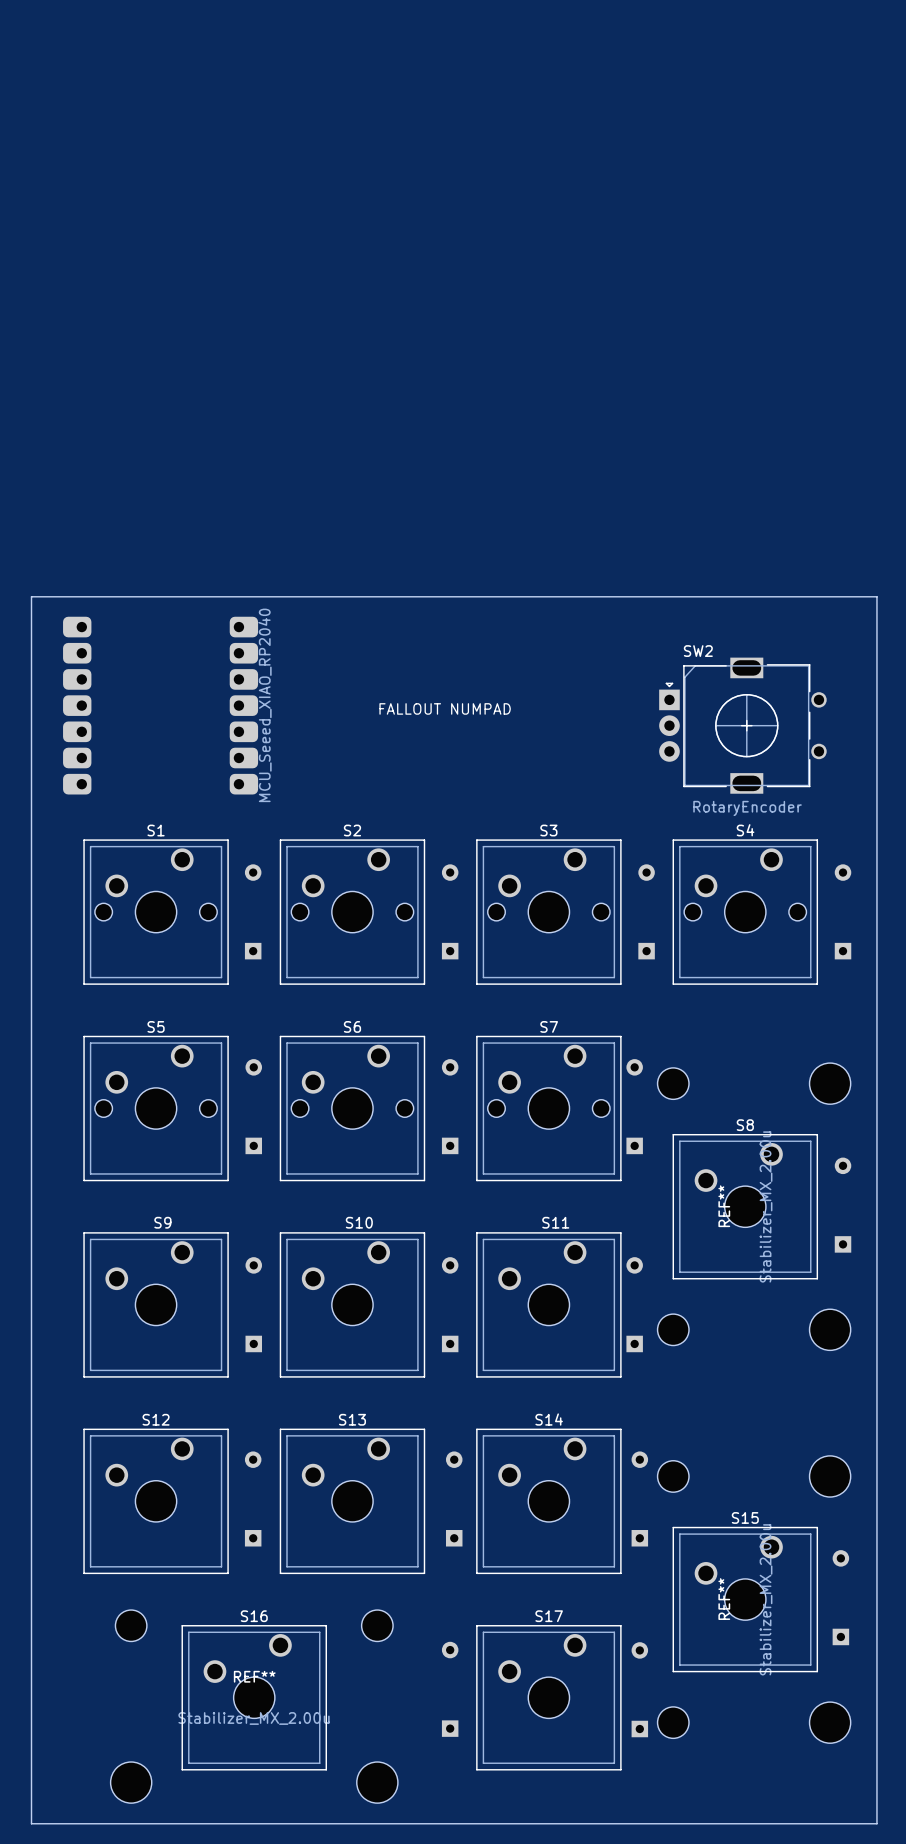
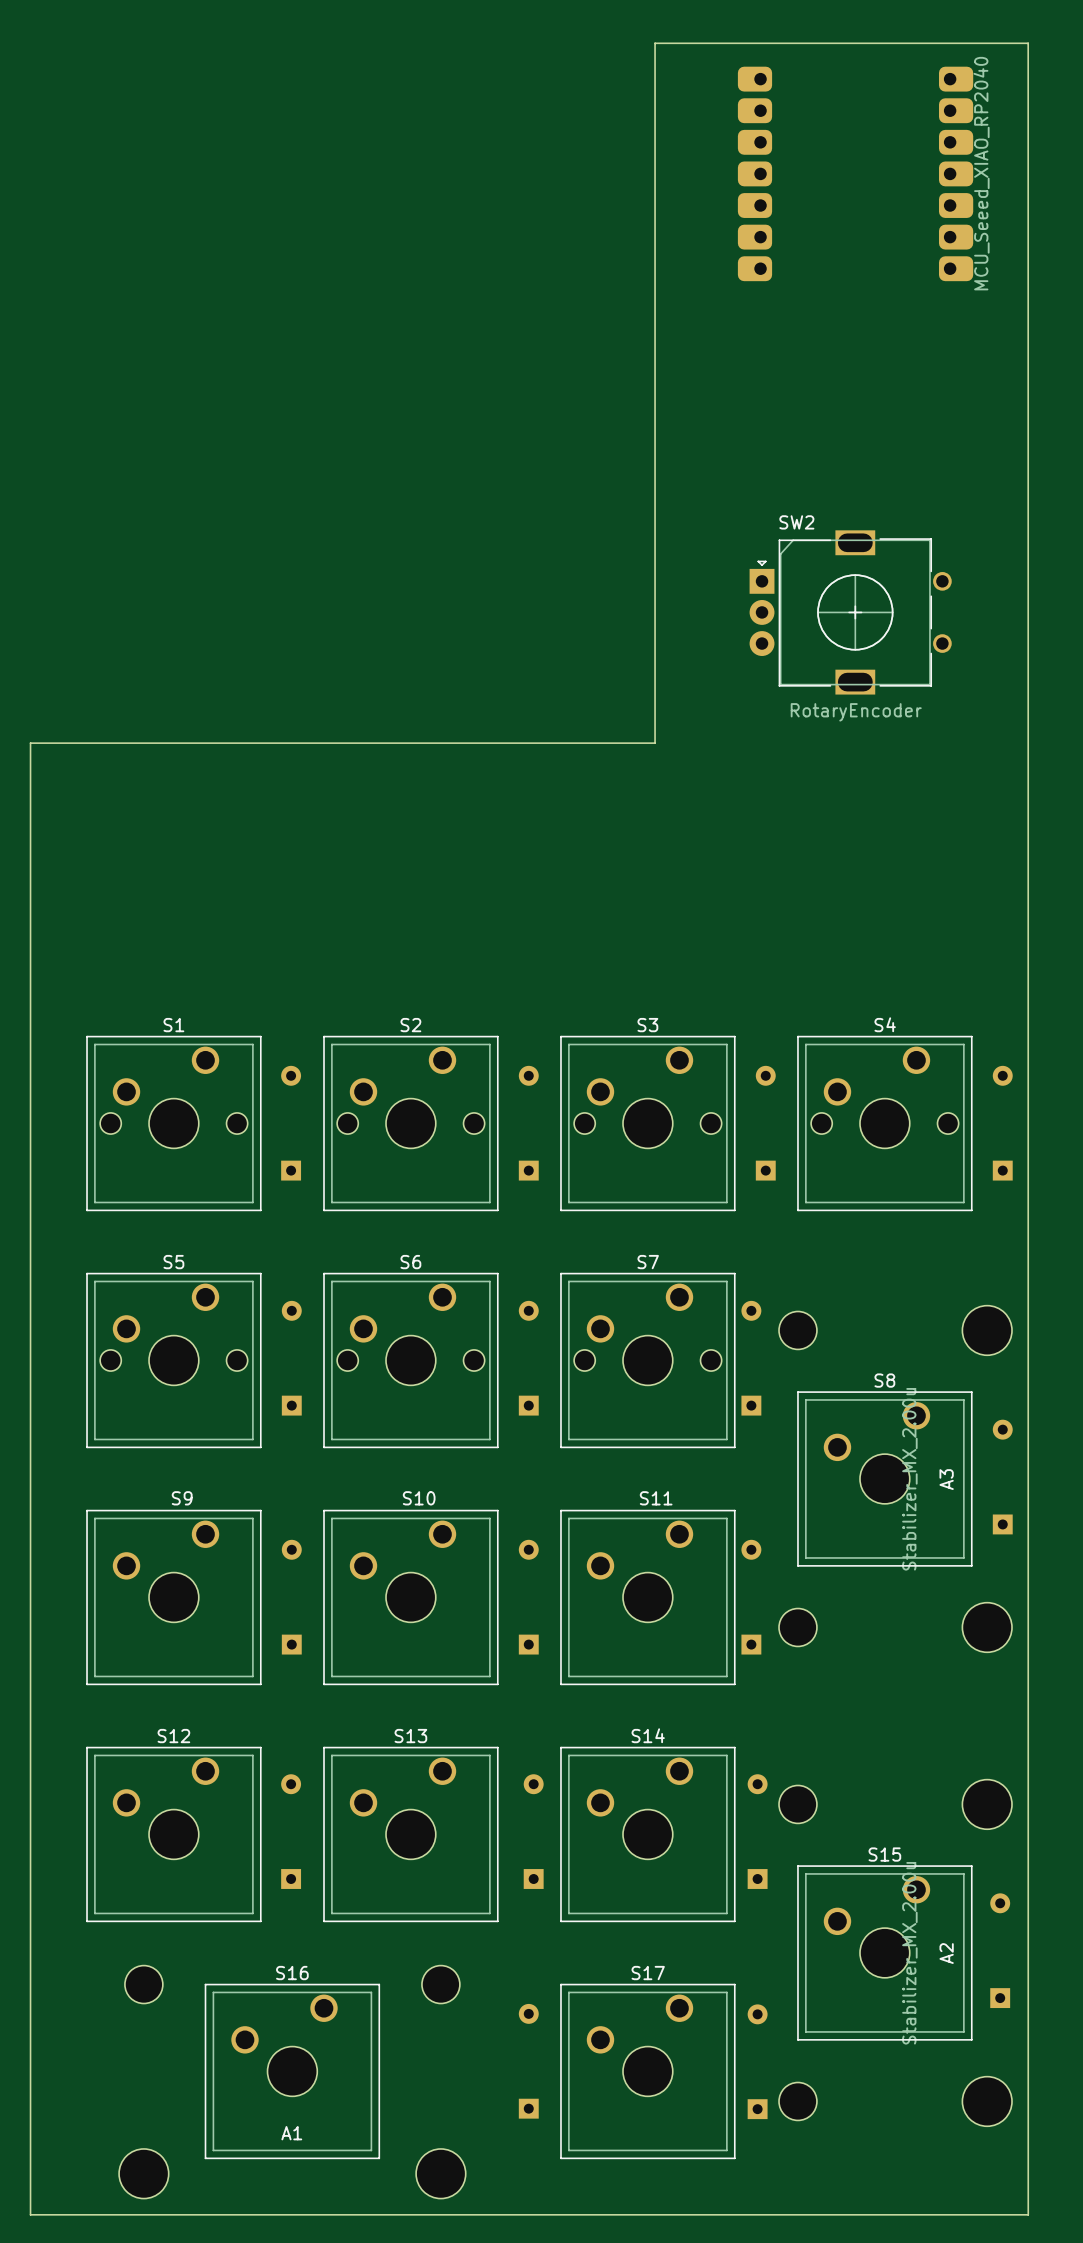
part: none -> MCU_Seeed_XIAO_RP2040 (855, 173)
board edge: (31, 596) (876, 596) (876, 1823) (31, 1823) (31, 596) -> (655, 43) (655, 743) (30, 743) (30, 2214) (1028, 2214) (1028, 43) (655, 43)
part: MCU_Seeed_XIAO_RP2040 (160, 705) -> none
text: FALLOUT NUMPAD (445, 708) -> none
SW2 position: (742, 725) -> (850, 612)
REF** name: REF** (724, 1206) -> A3 (946, 1479)
REF** name: REF** (724, 1599) -> A2 (946, 1953)
REF** name: REF** (254, 1676) -> A1 (291, 2133)
REF** value: Stabilizer_MX_2.00u (254, 1718) -> none

